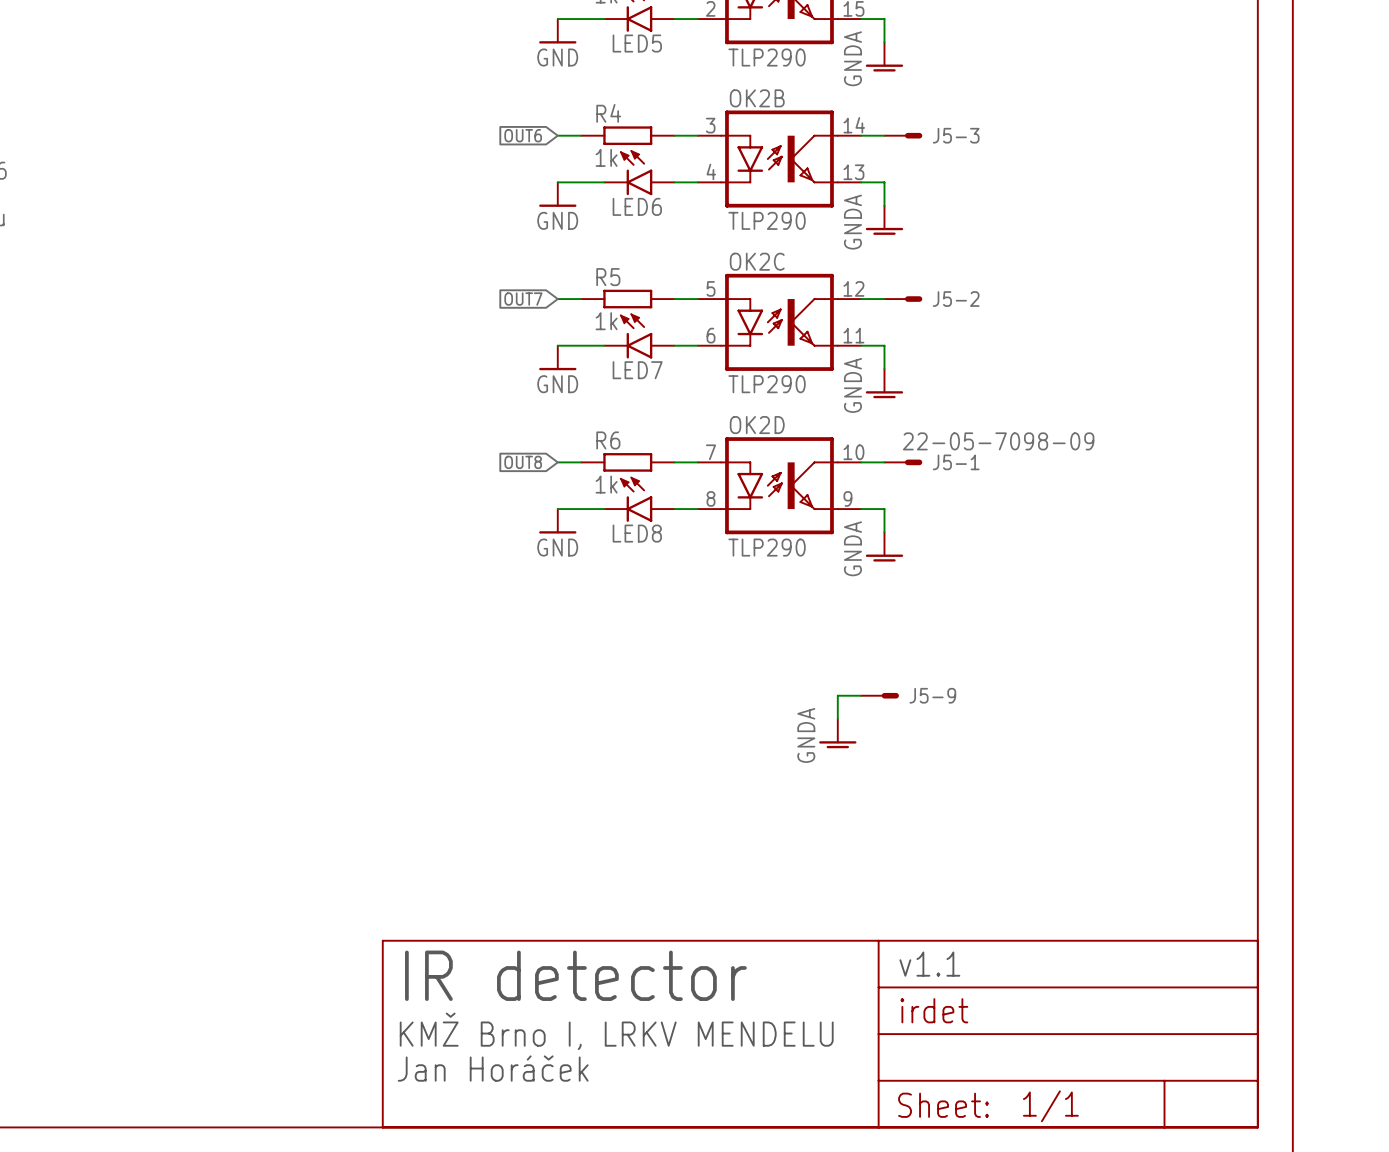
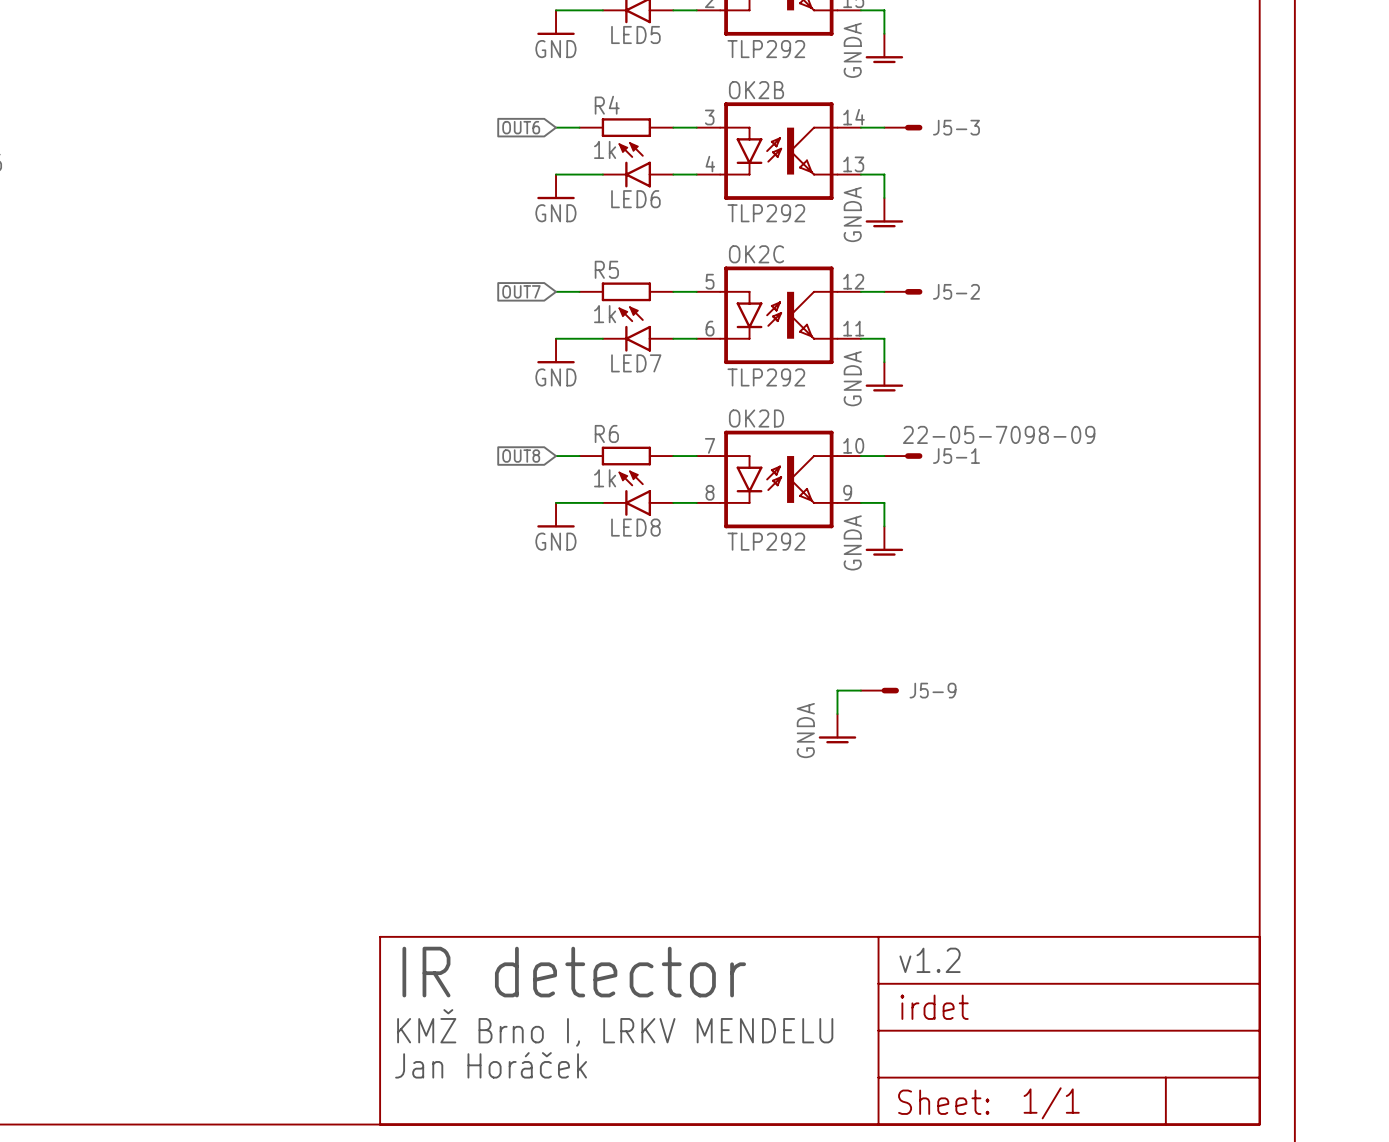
part value: TLP290 (767, 57) -> TLP292 (766, 49)
OK2B value: TLP290 (767, 220) -> TLP292 (766, 213)
OK2C value: TLP290 (767, 384) -> TLP292 (766, 377)
OK2D value: TLP290 (767, 547) -> TLP292 (766, 541)
text: v1.1 (929, 964) -> v1.2 (930, 960)

